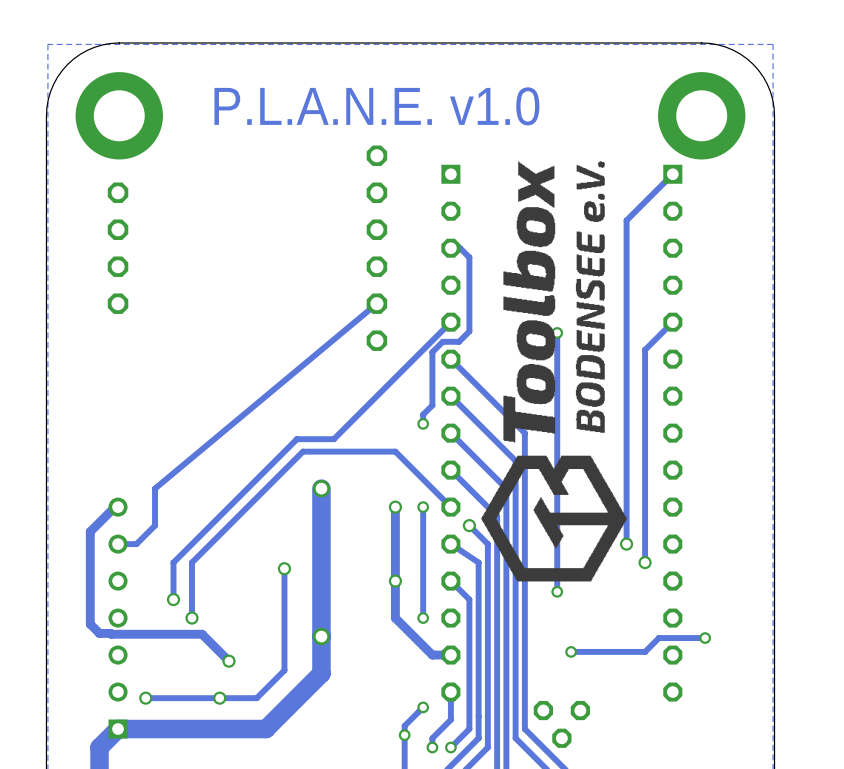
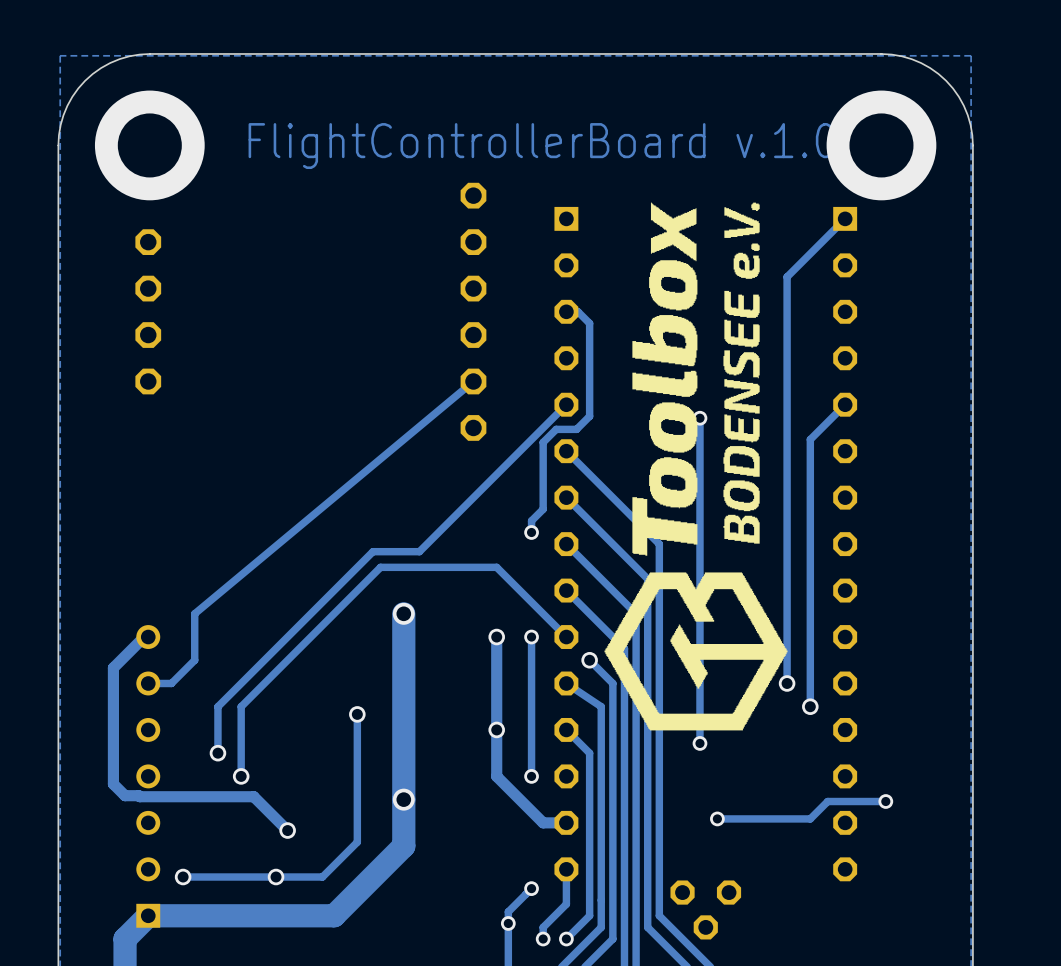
text: P.L.A.N.E. v1.0 (376, 106) -> none
text: none -> FlightControllerBoard v.1.0 (541, 146)

